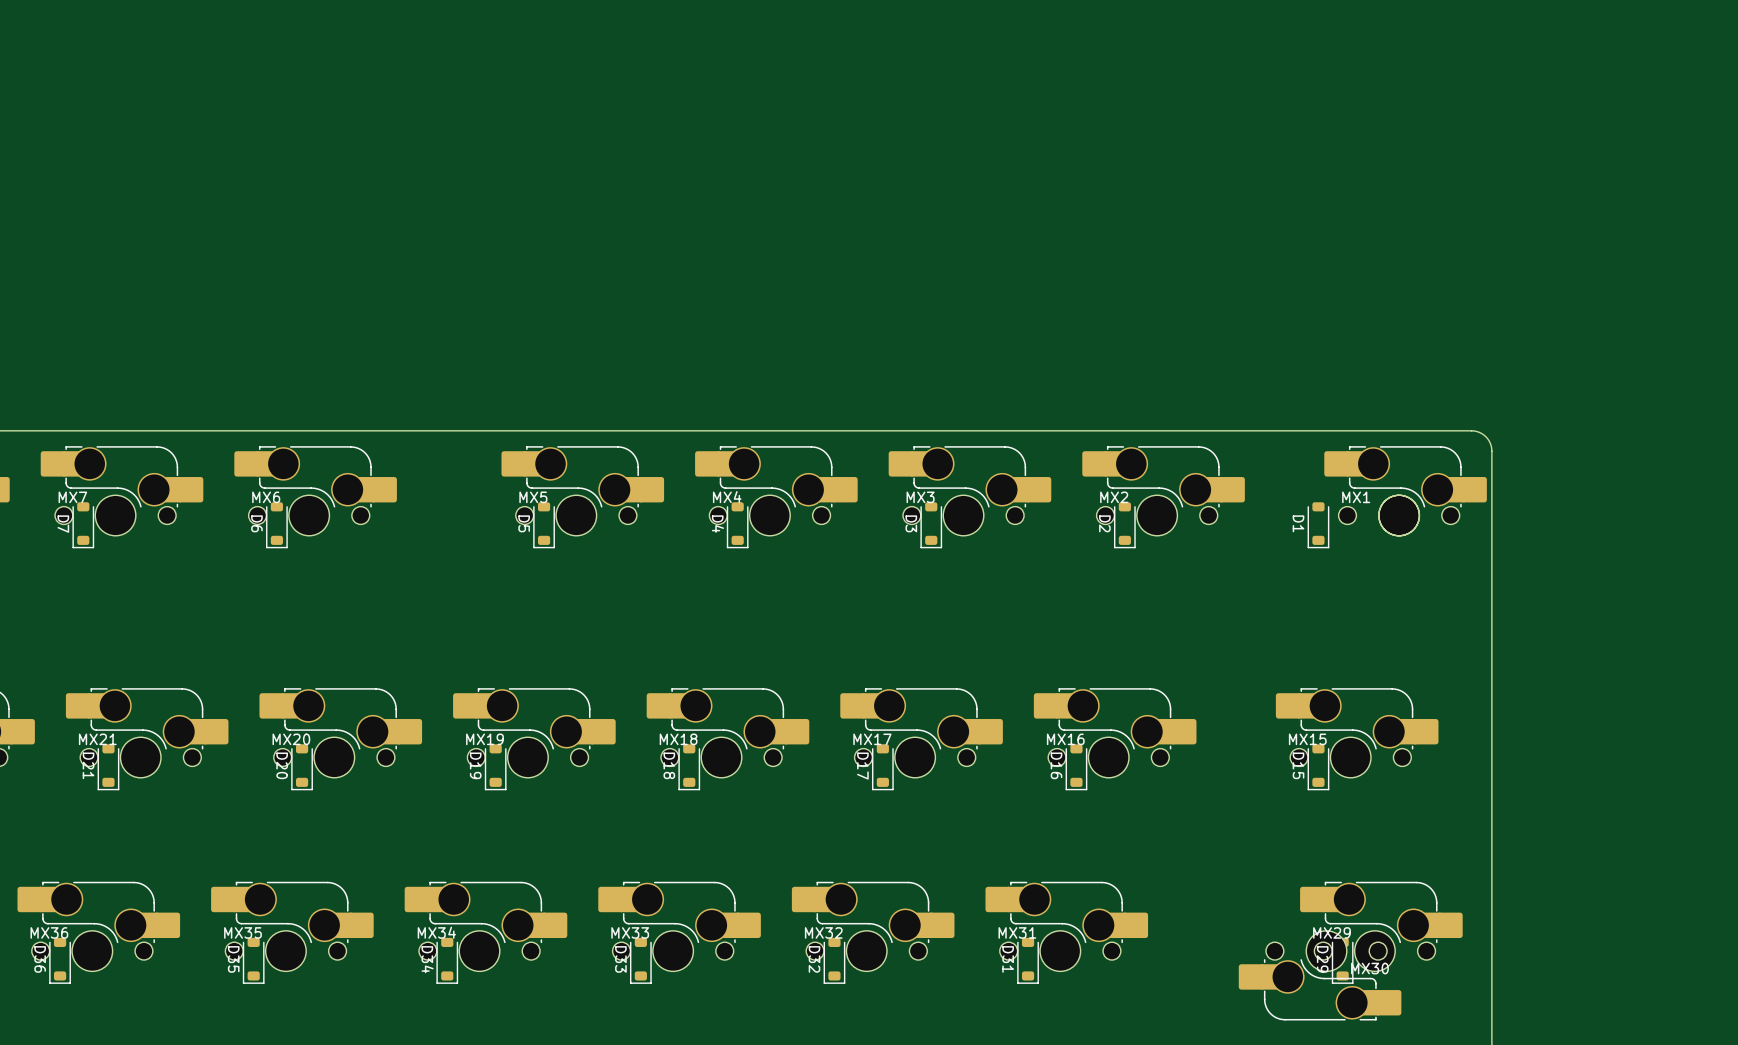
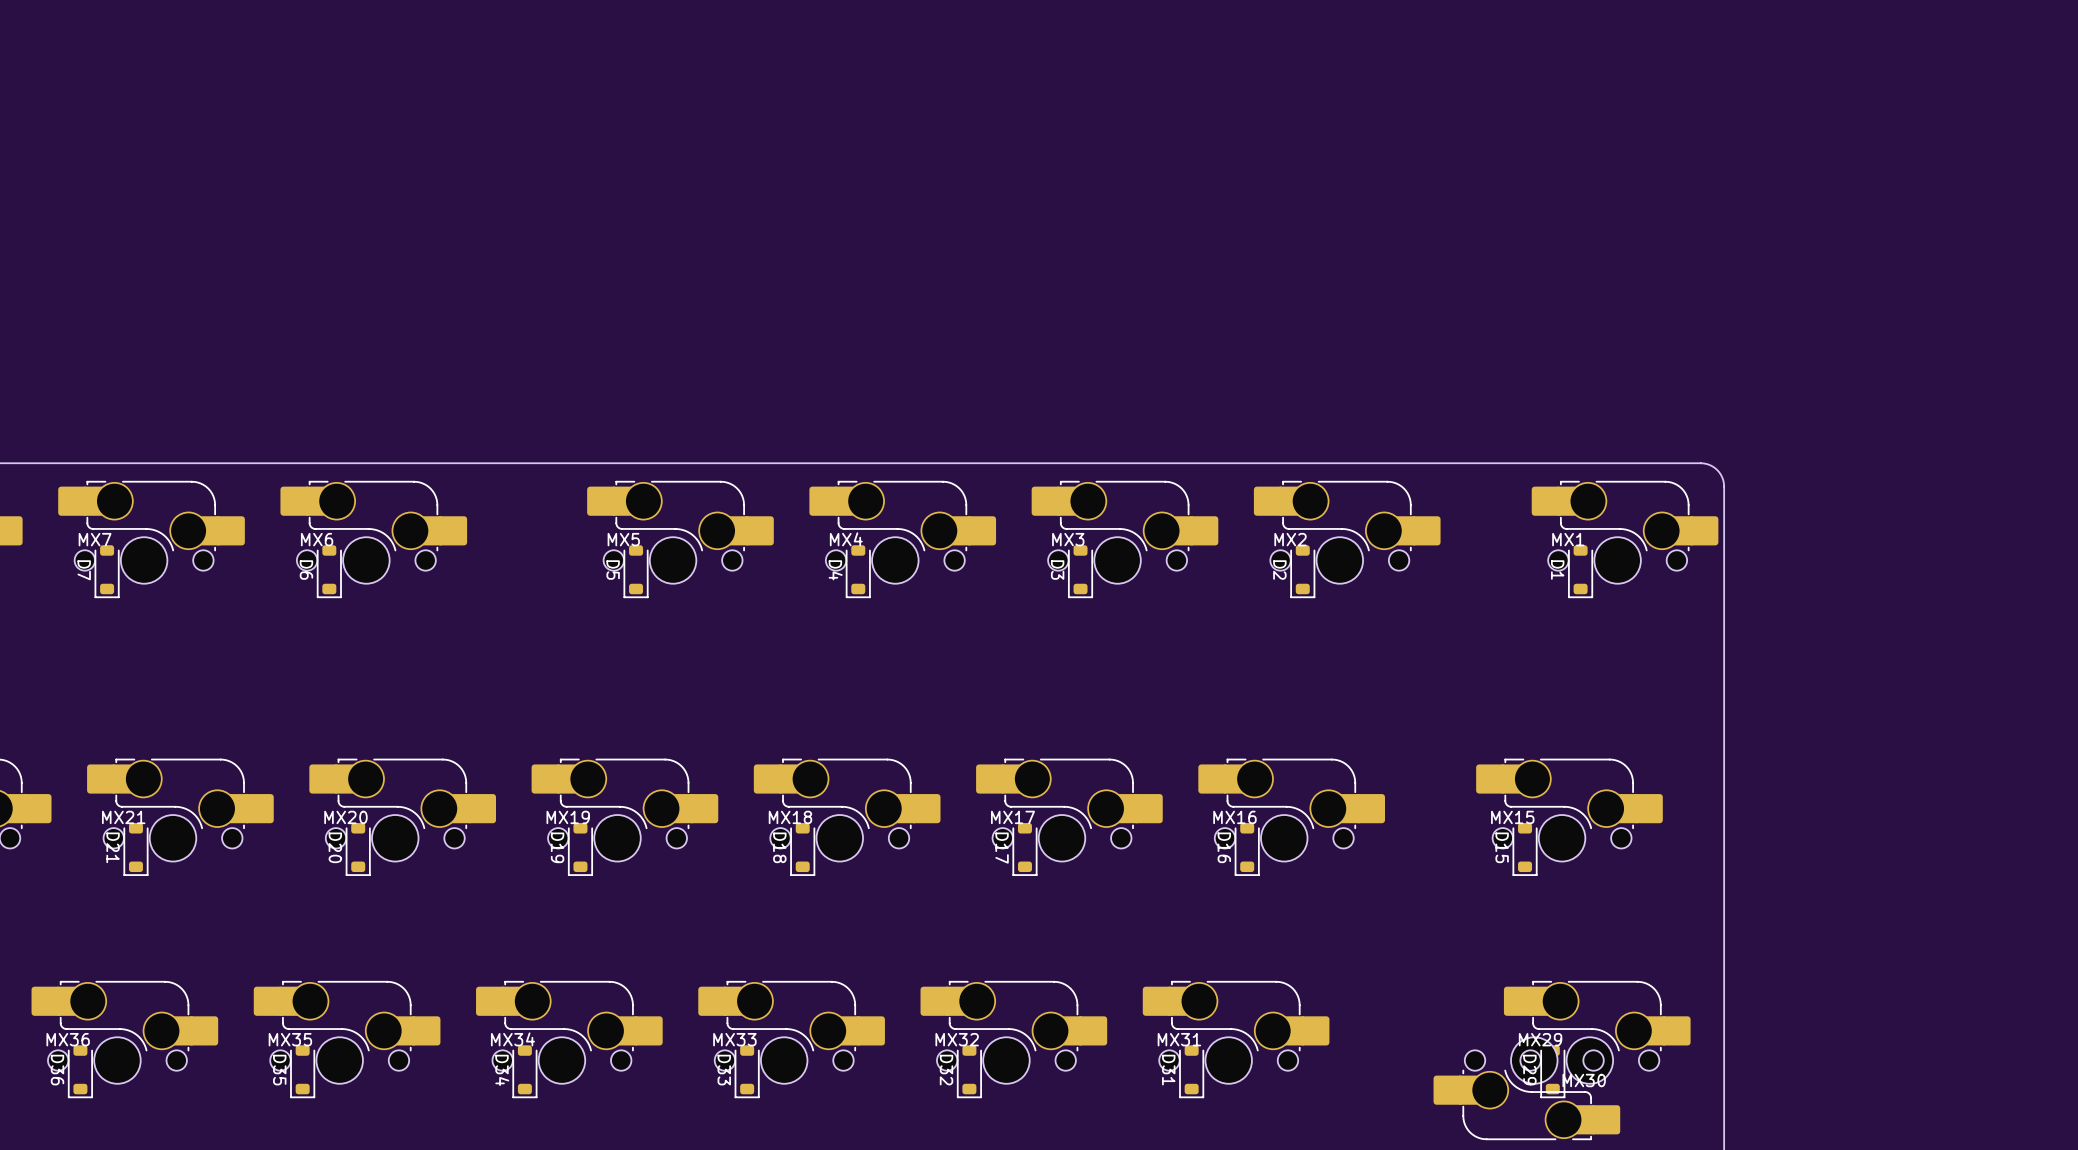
part: (1399, 515) -> none
D1 position: (1318, 525) -> (1580, 571)

